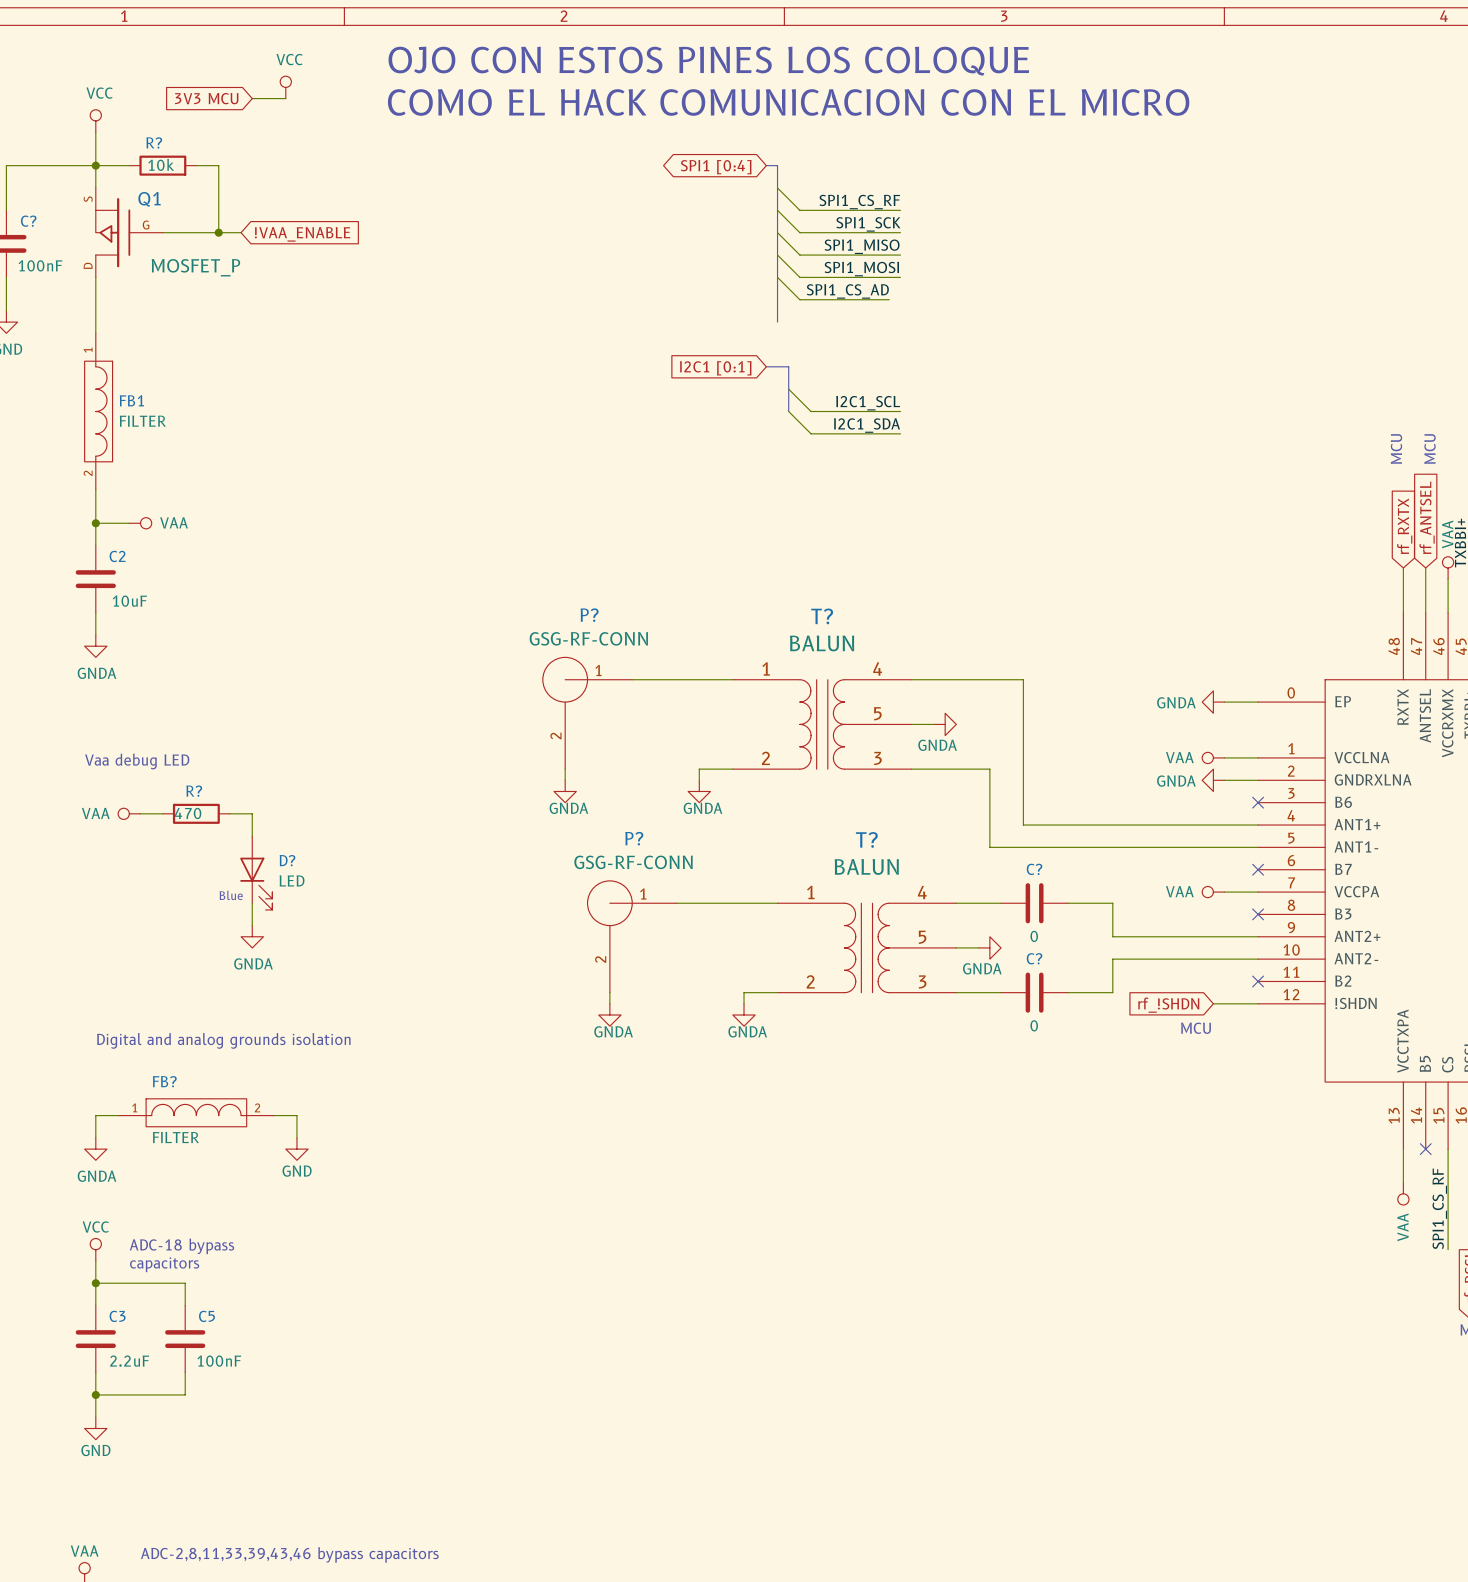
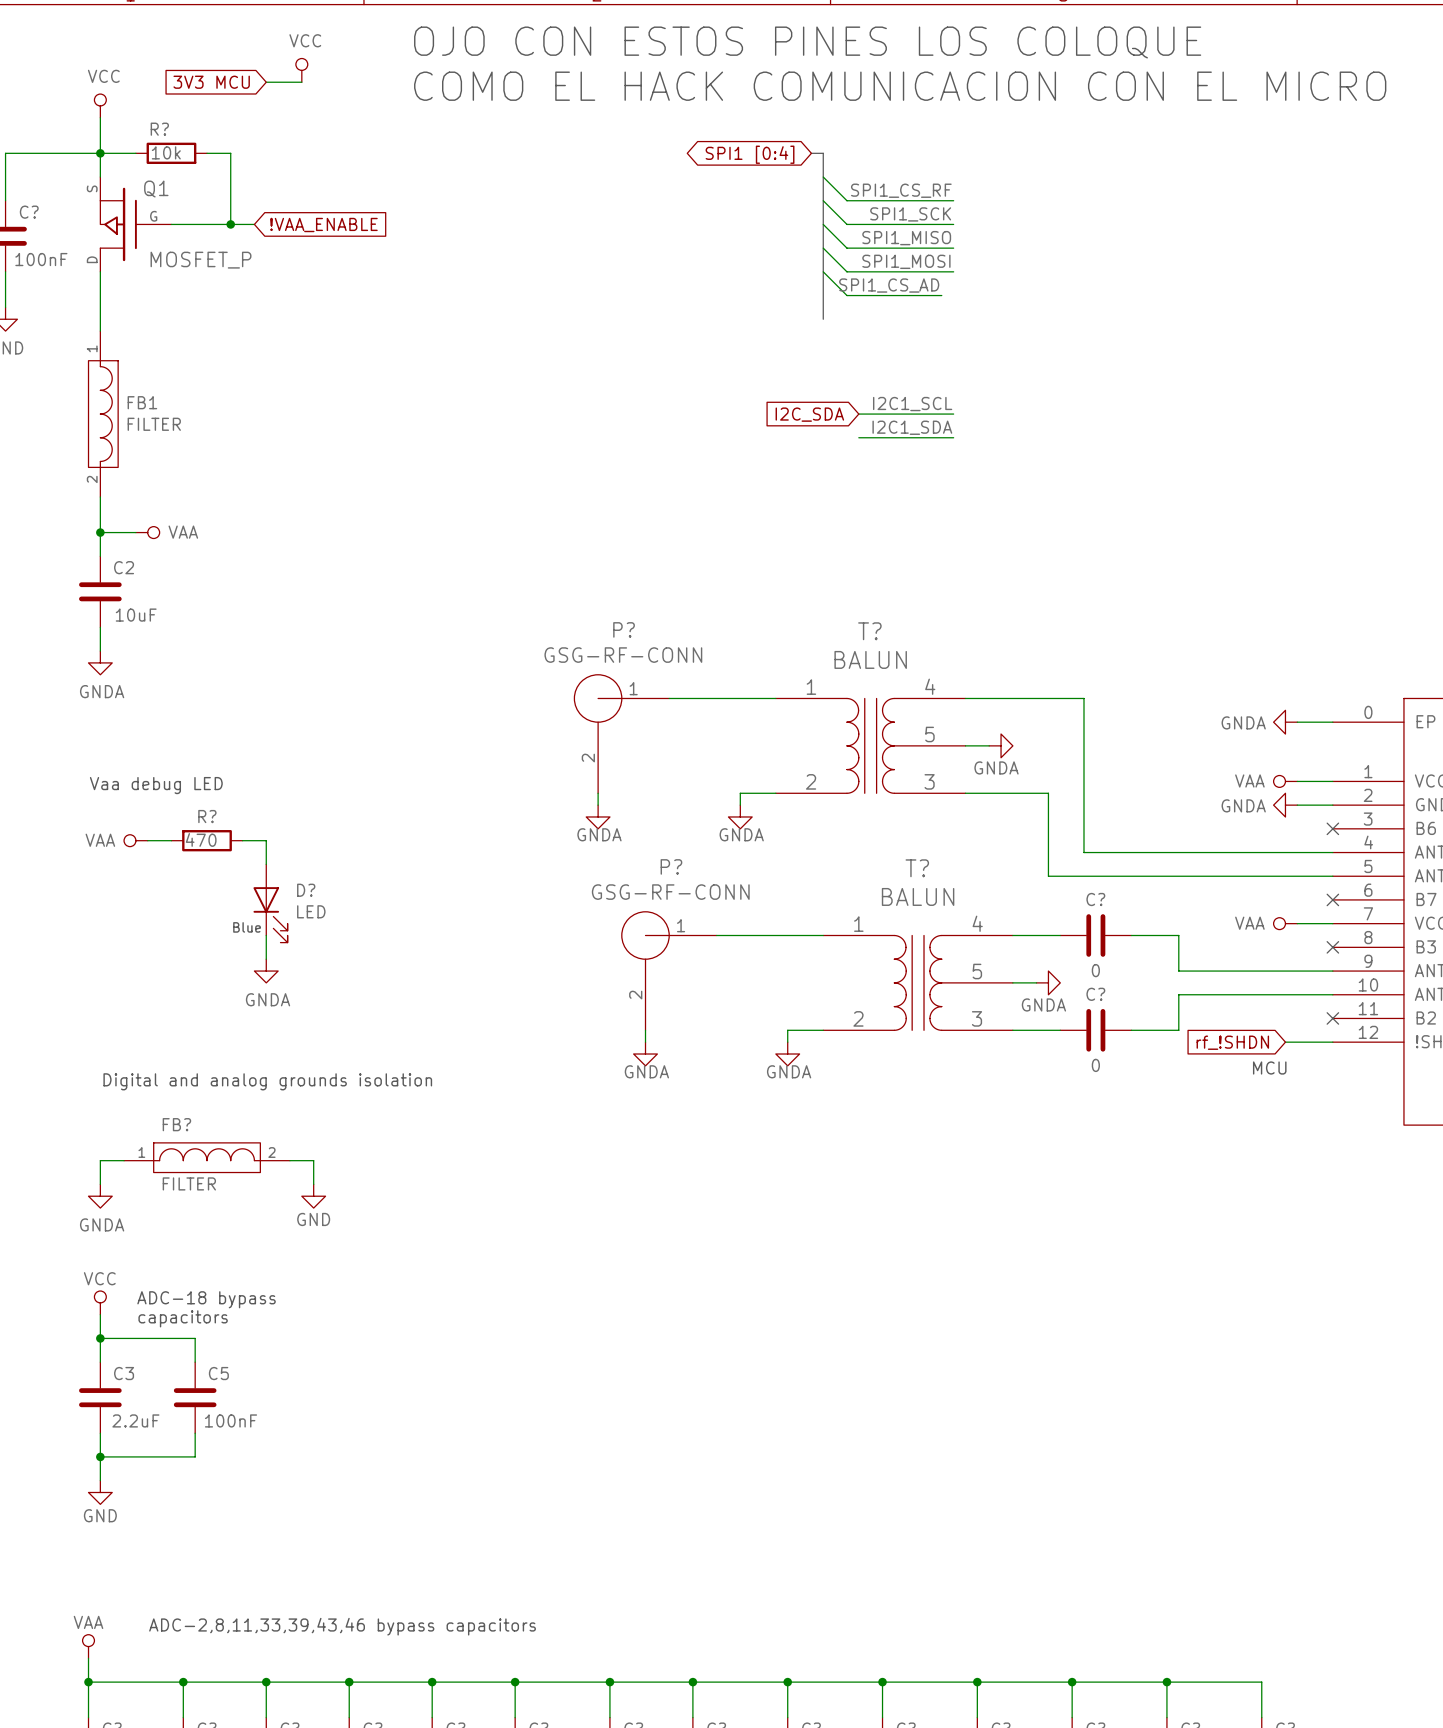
bus: (766, 366) (788, 366) (788, 411) -> none
global label: I2C1 [0:1] (715, 368) -> none
wire: (788, 389) (811, 411) -> none
wire: (788, 411) (811, 433) -> none
global label: none -> I2C_SDA (809, 414)

